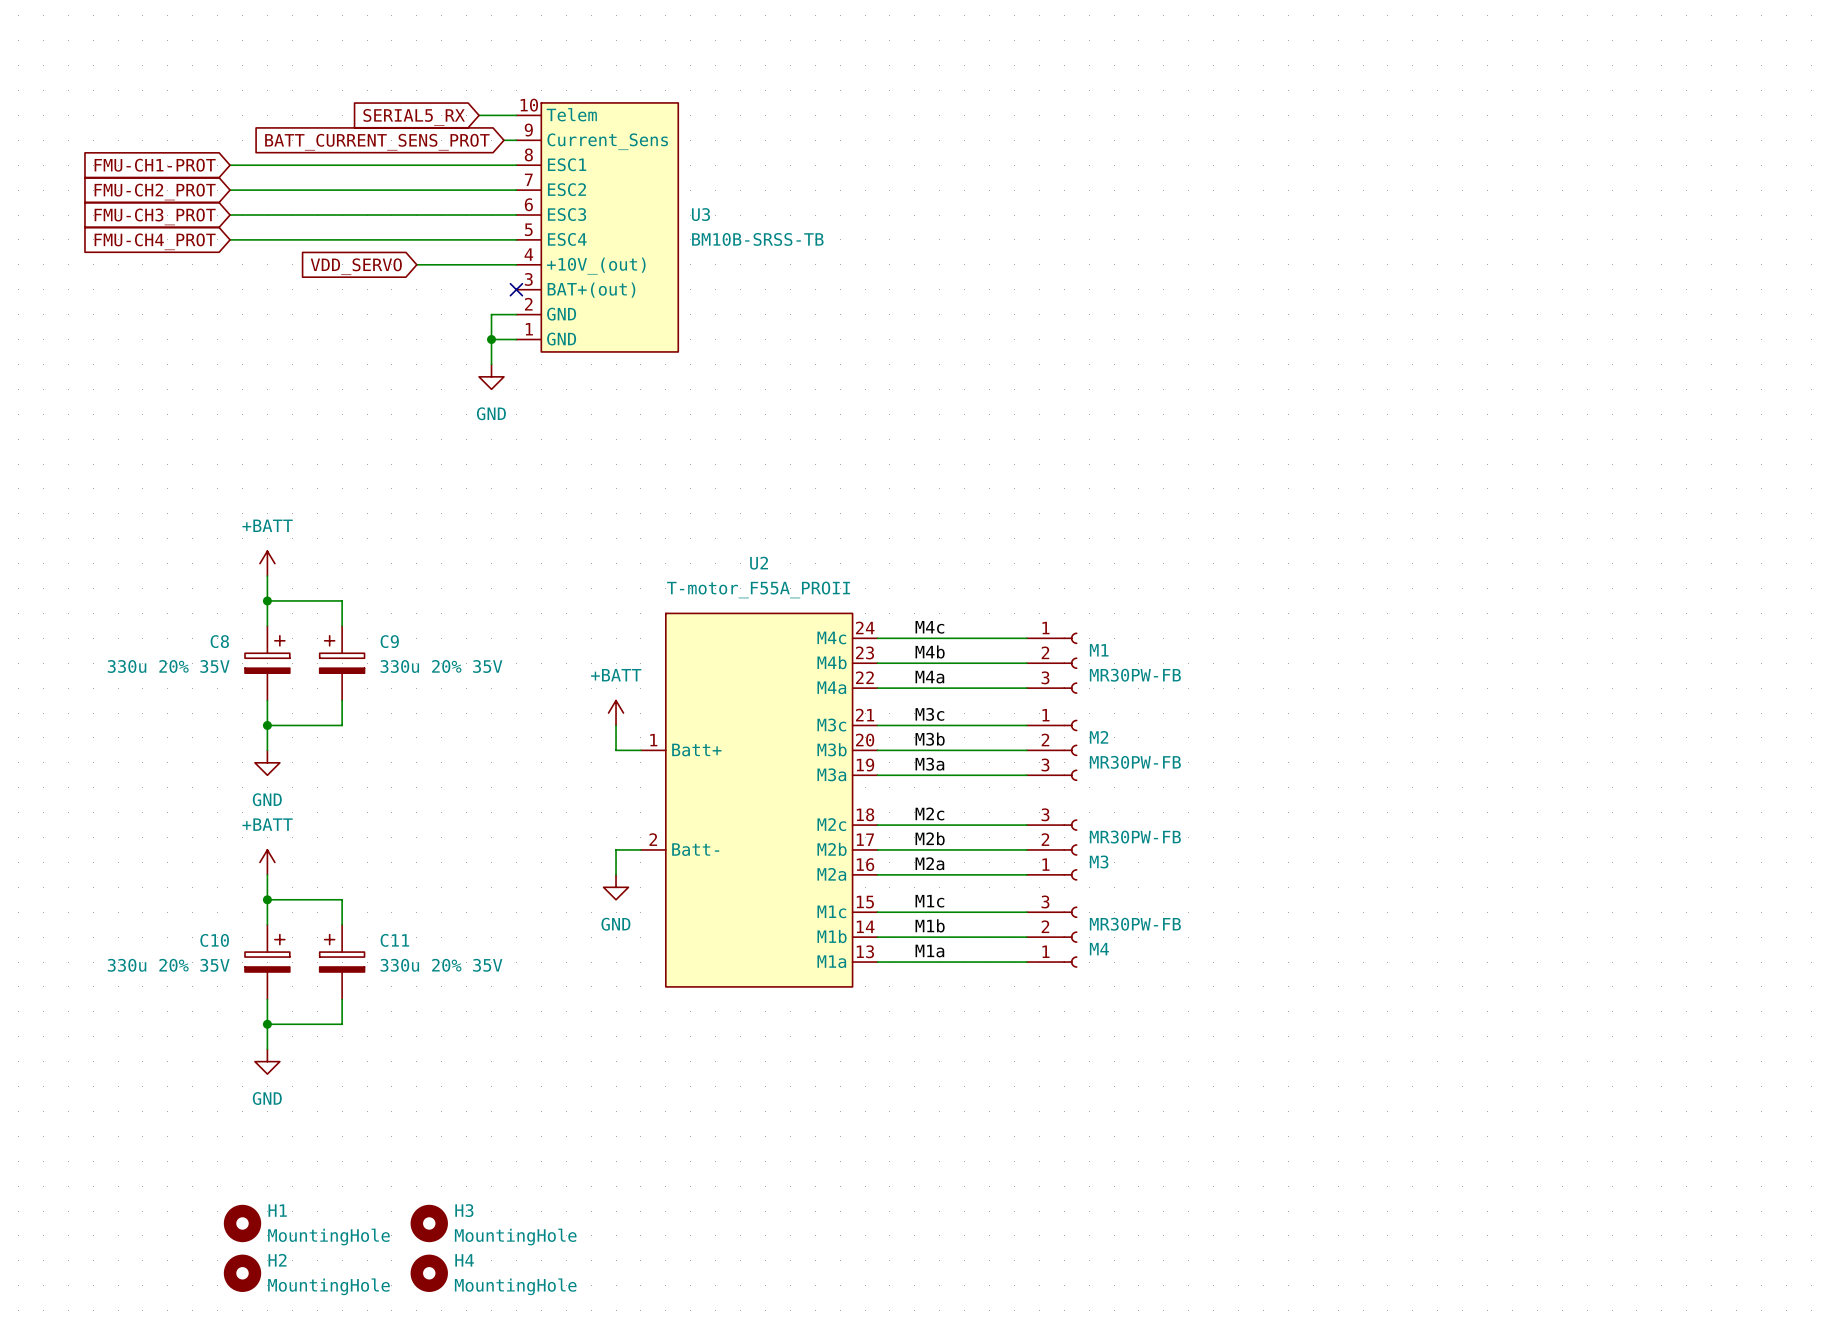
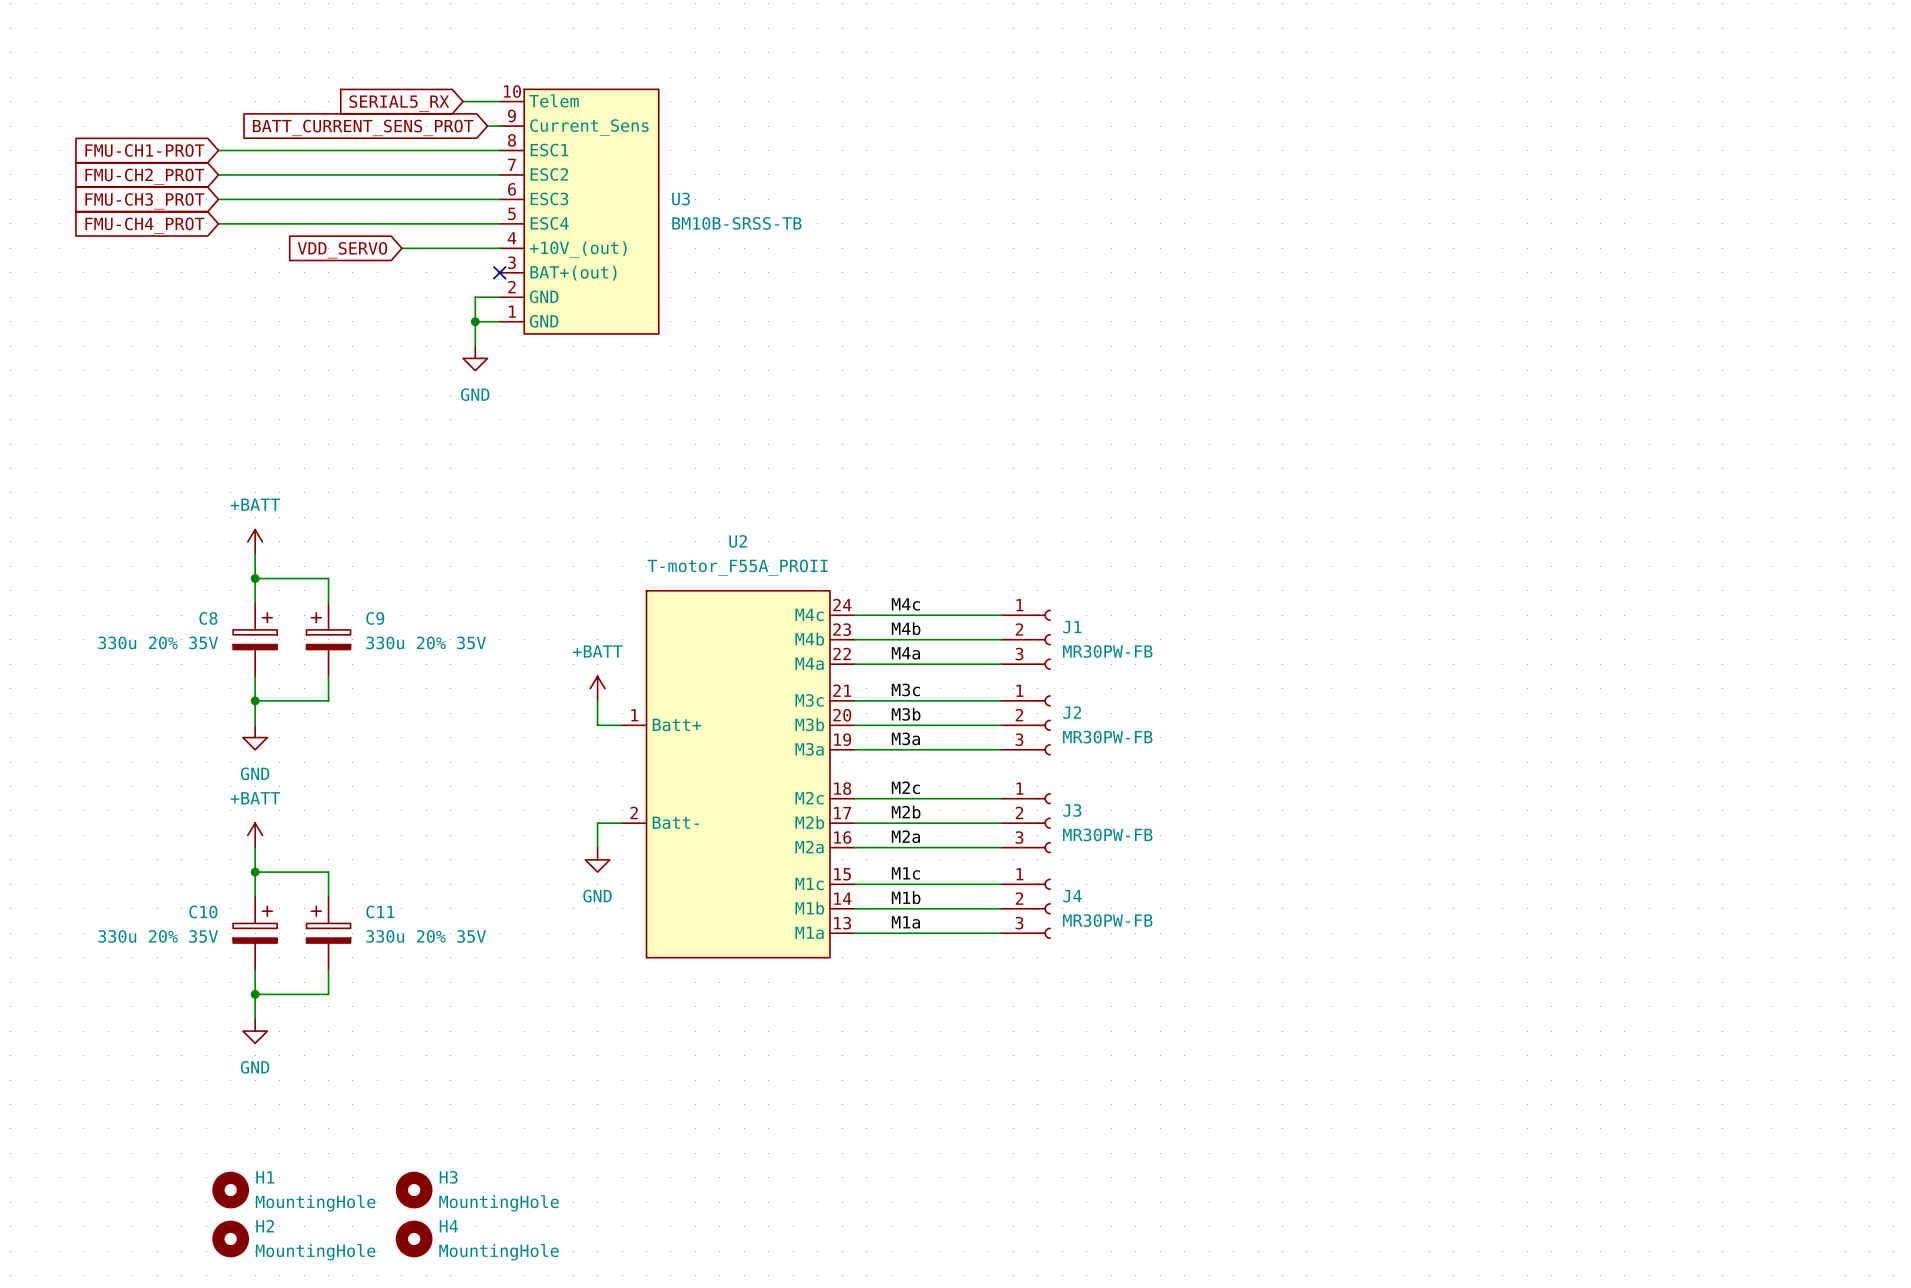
M1 name: M1 (1099, 650) -> J1 (1072, 627)
M2 name: M2 (1099, 737) -> J2 (1072, 712)
M3 flip: as is (1070, 849) -> up-down (1043, 823)
M3 name: M3 (1099, 861) -> J3 (1072, 810)
M4 flip: as is (1070, 937) -> up-down (1043, 908)
M4 name: M4 (1099, 949) -> J4 (1072, 896)

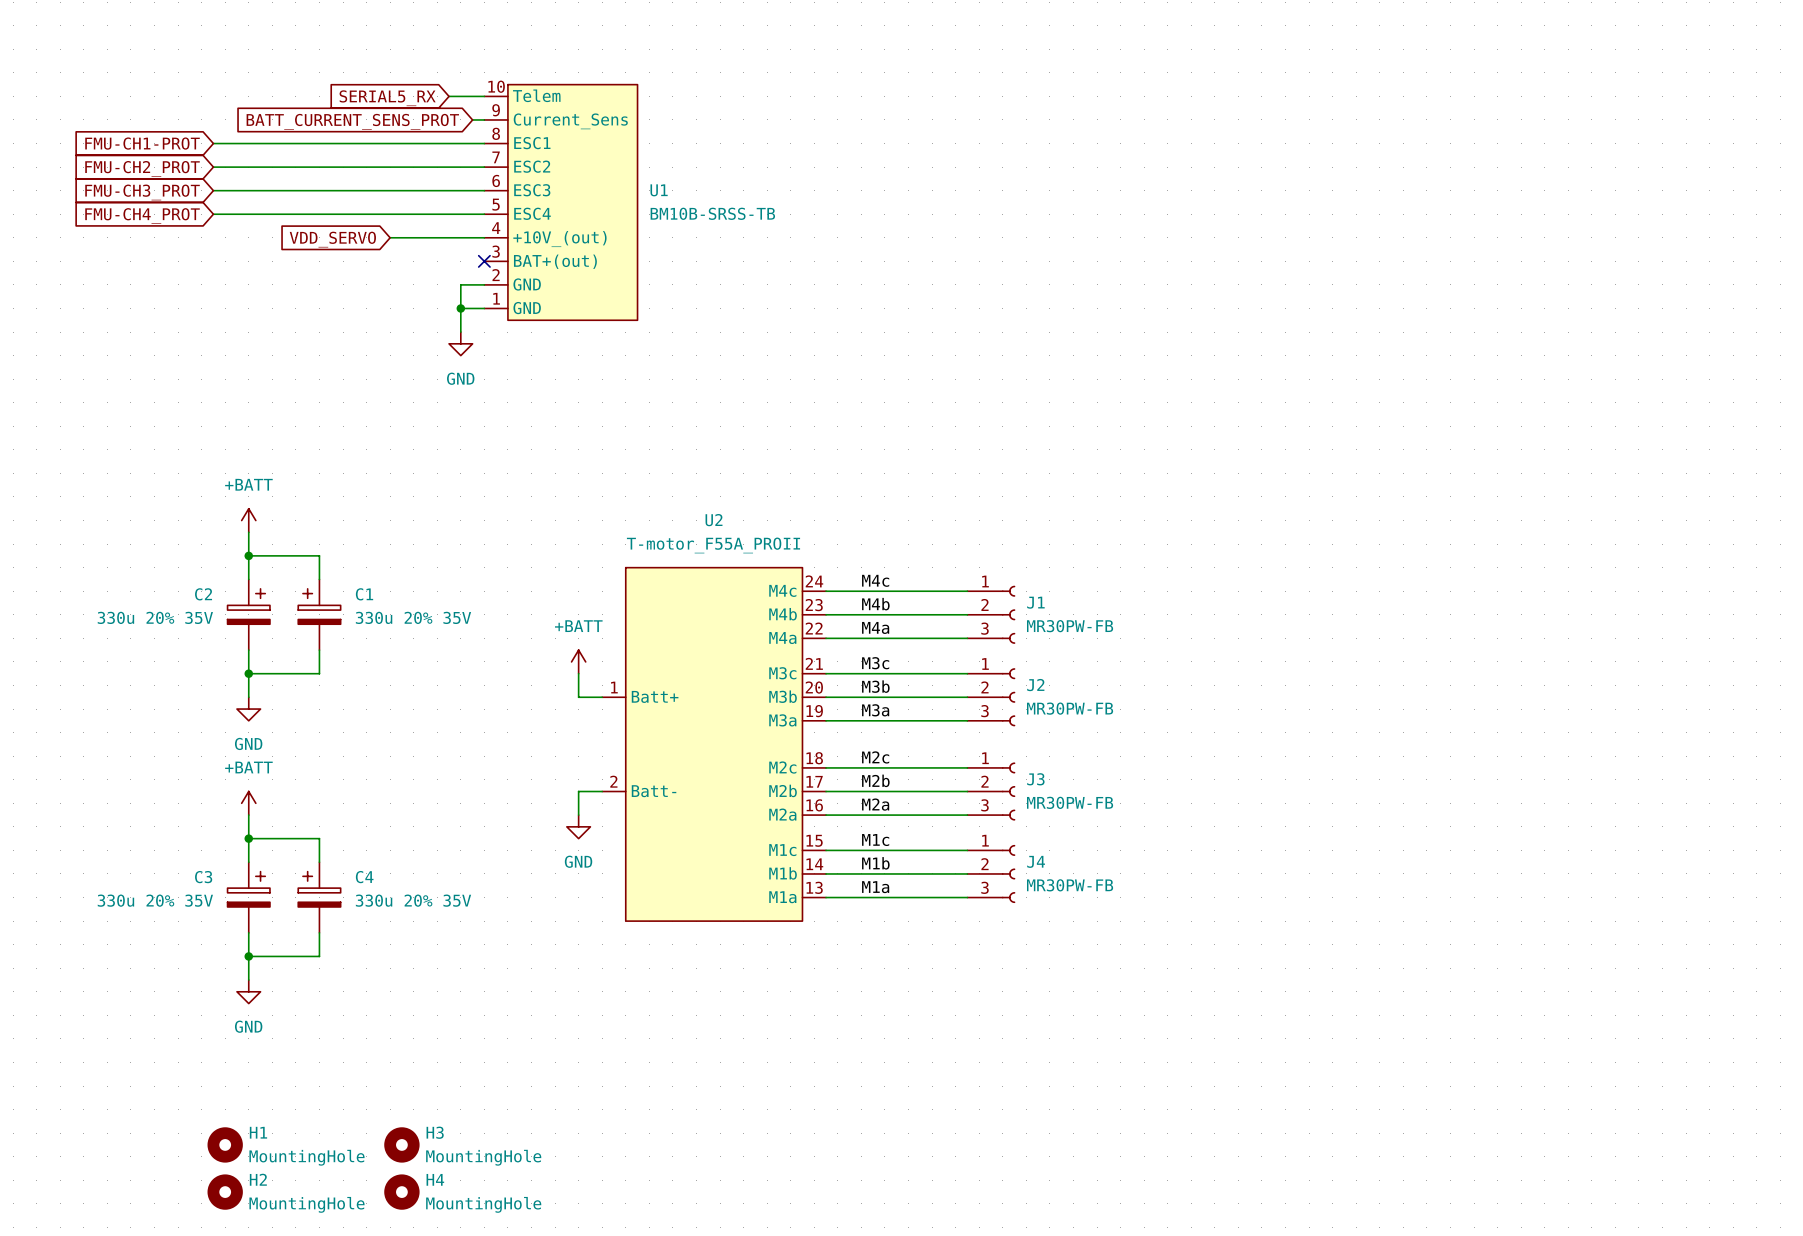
U3 name: U3 (681, 198) -> U1 (659, 190)
C8 name: C8 (208, 618) -> C2 (203, 594)
C9 name: C9 (375, 618) -> C1 (364, 594)
C10 name: C10 (203, 911) -> C3 (203, 877)
C11 name: C11 (380, 911) -> C4 (364, 877)

